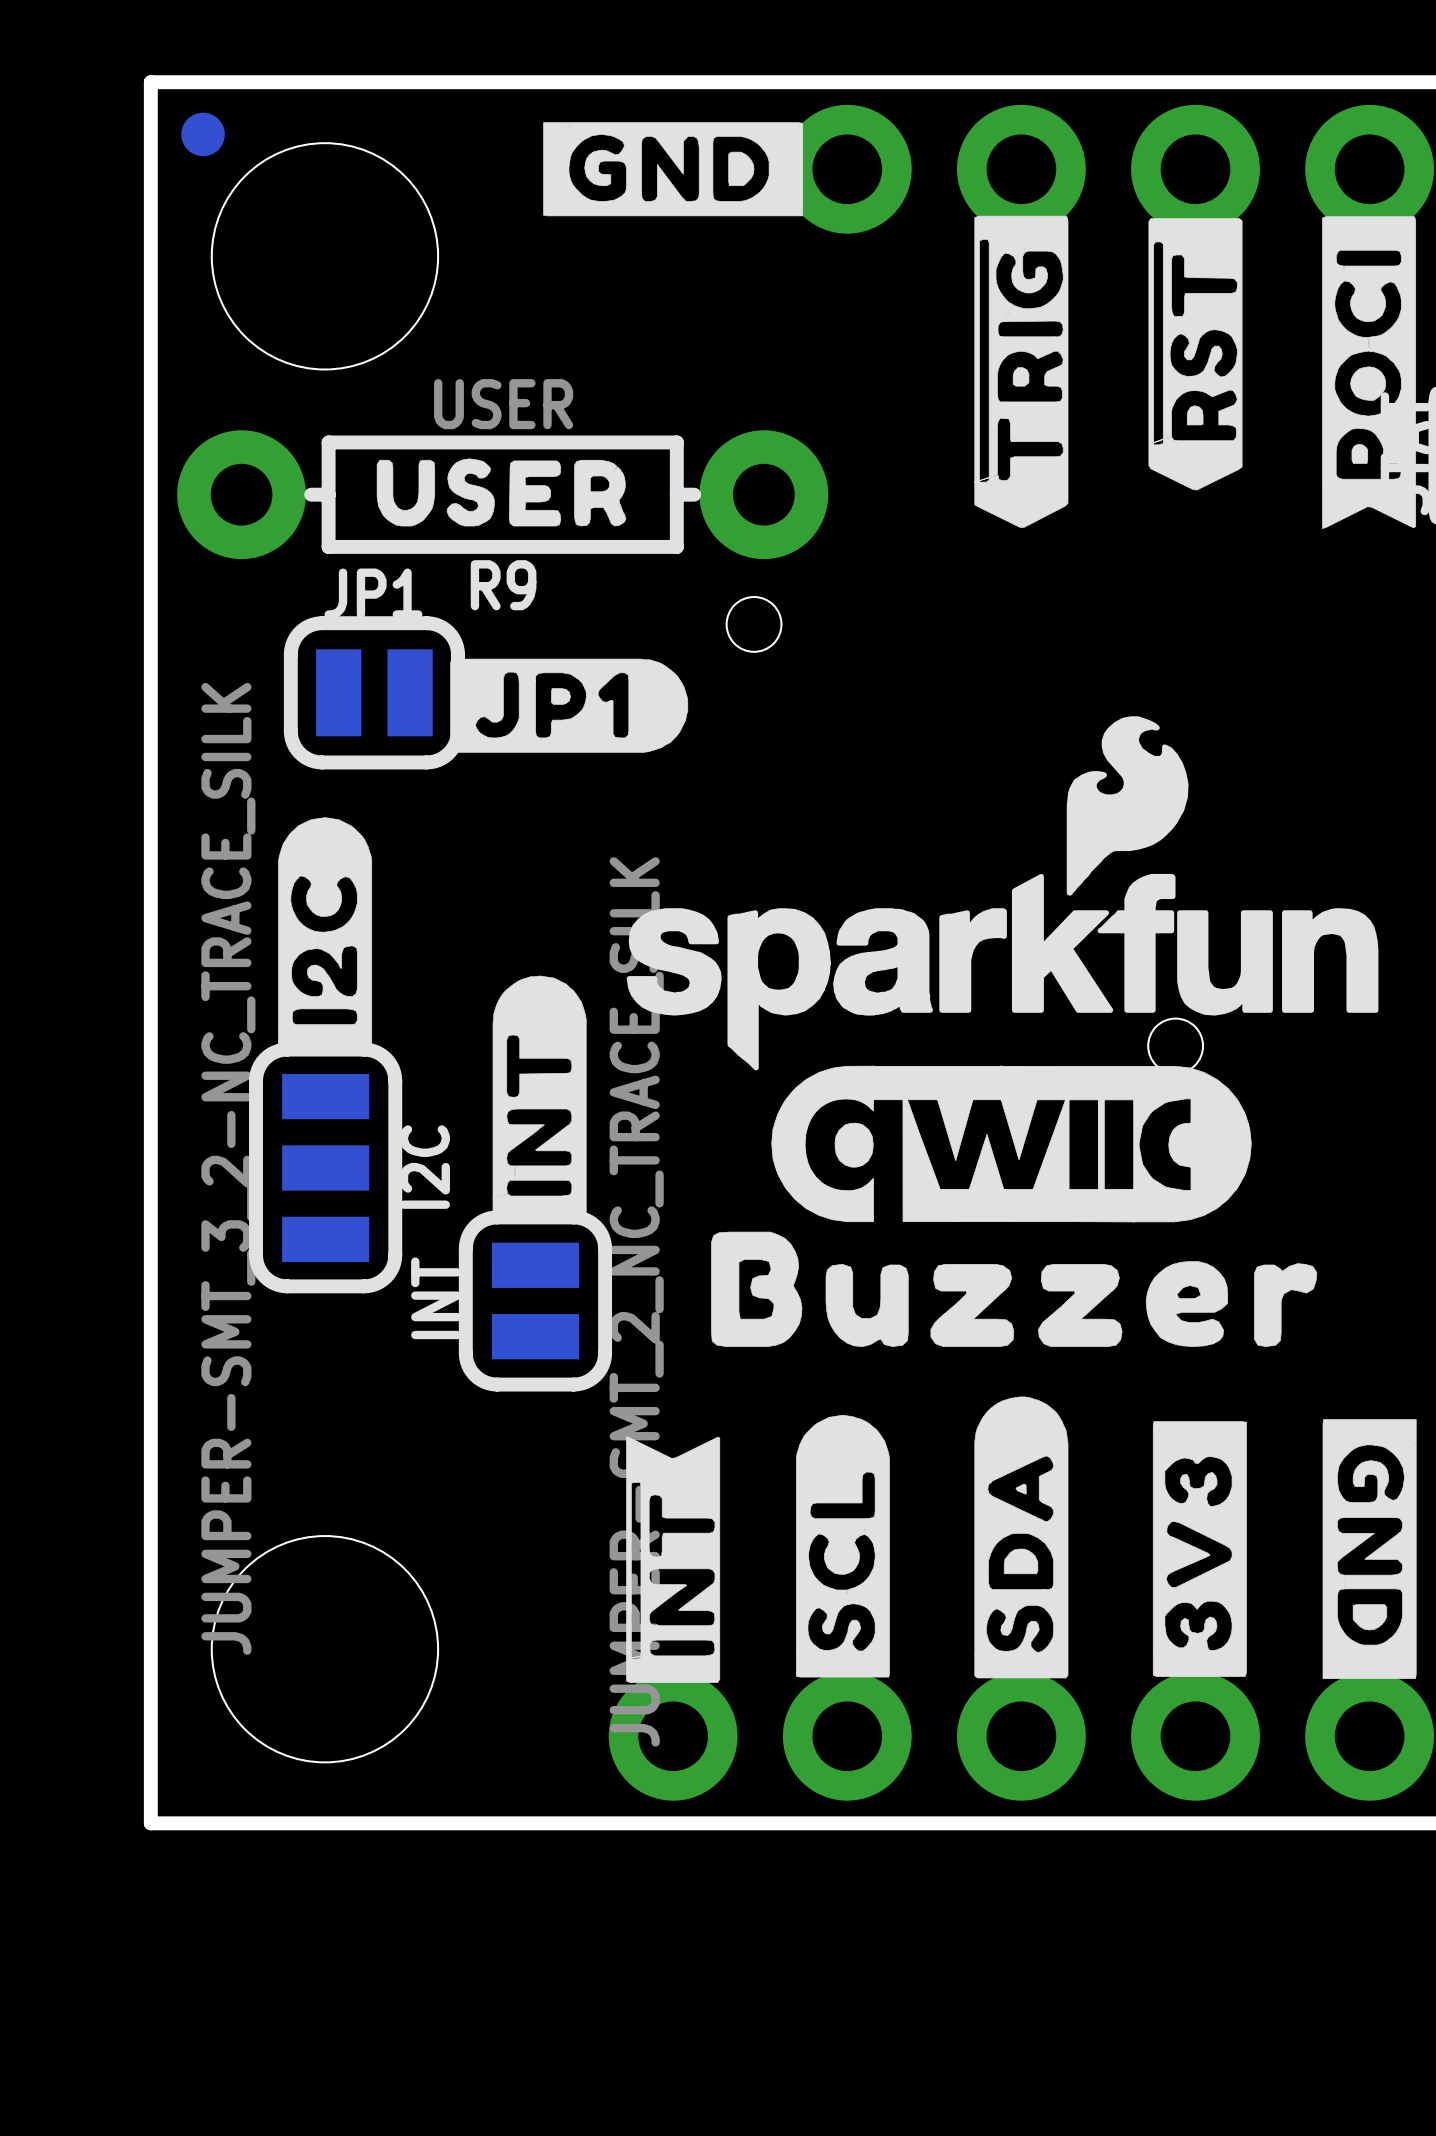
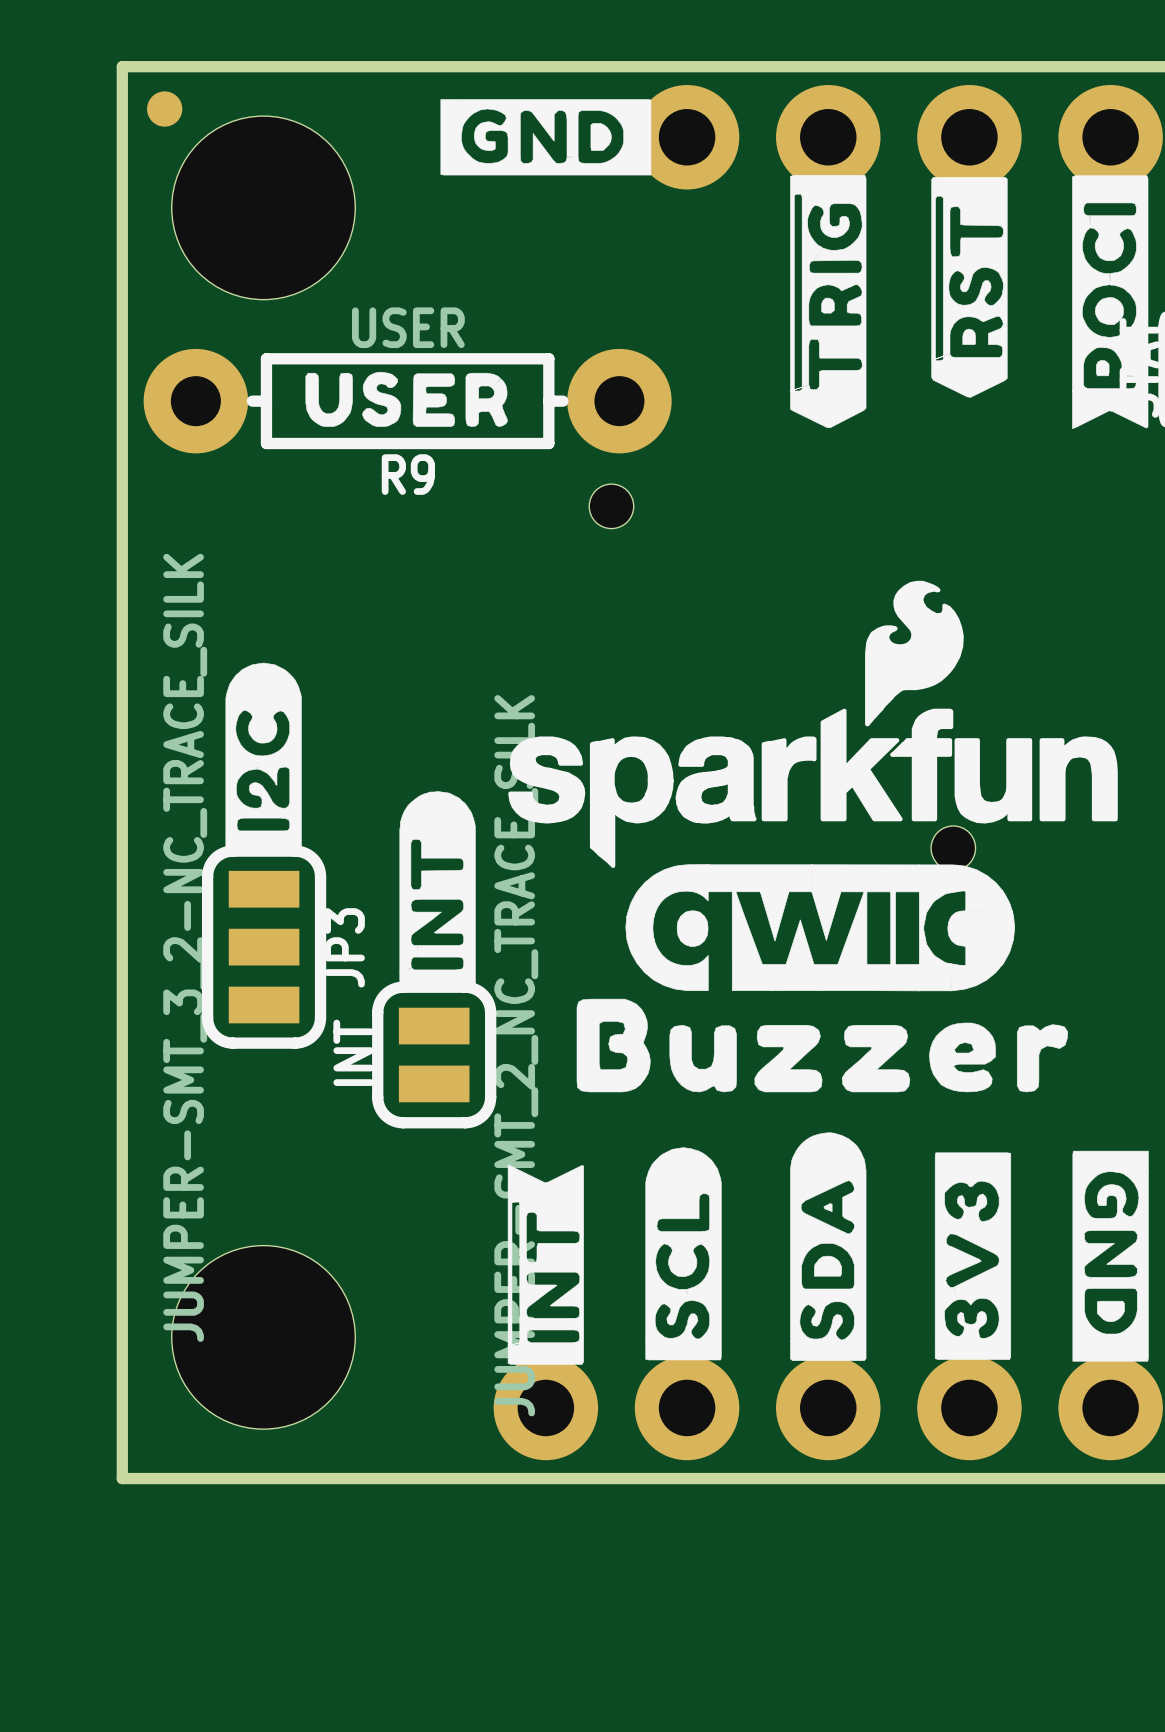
drawing: [450, 658, 689, 753] -> none
JP1: (374, 692) -> none
I2C name: I2C (424, 1167) -> JP3 (344, 947)

